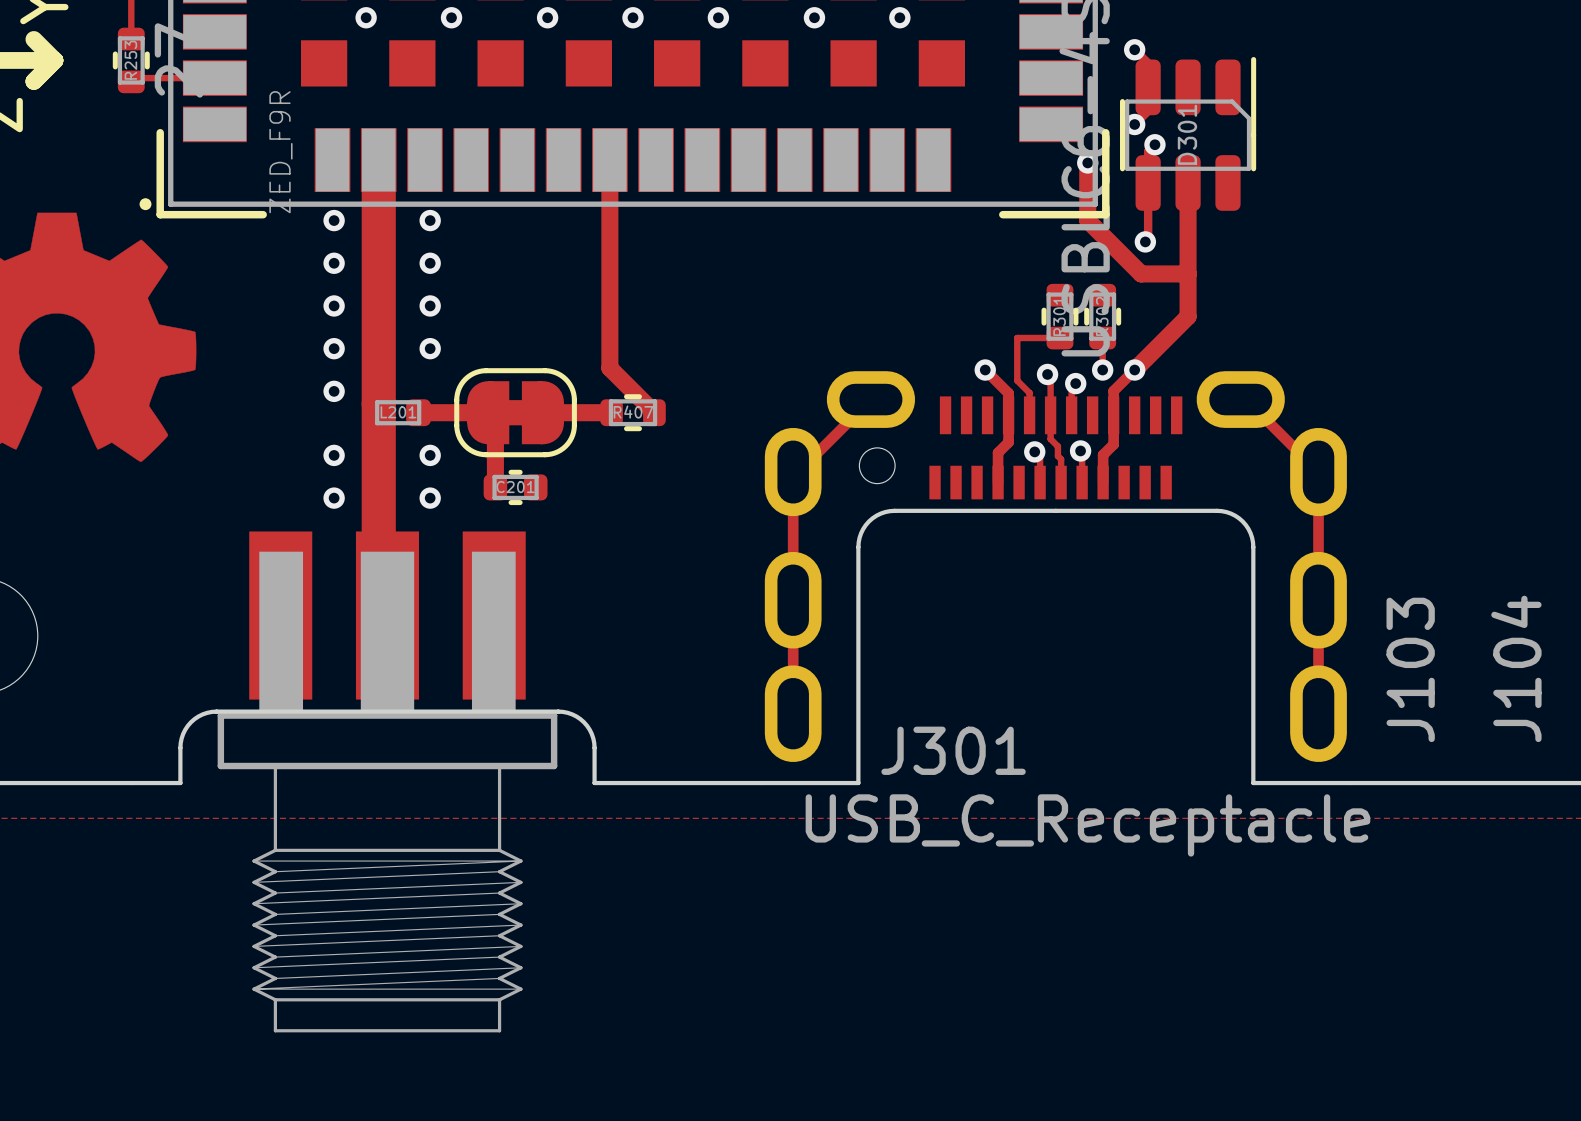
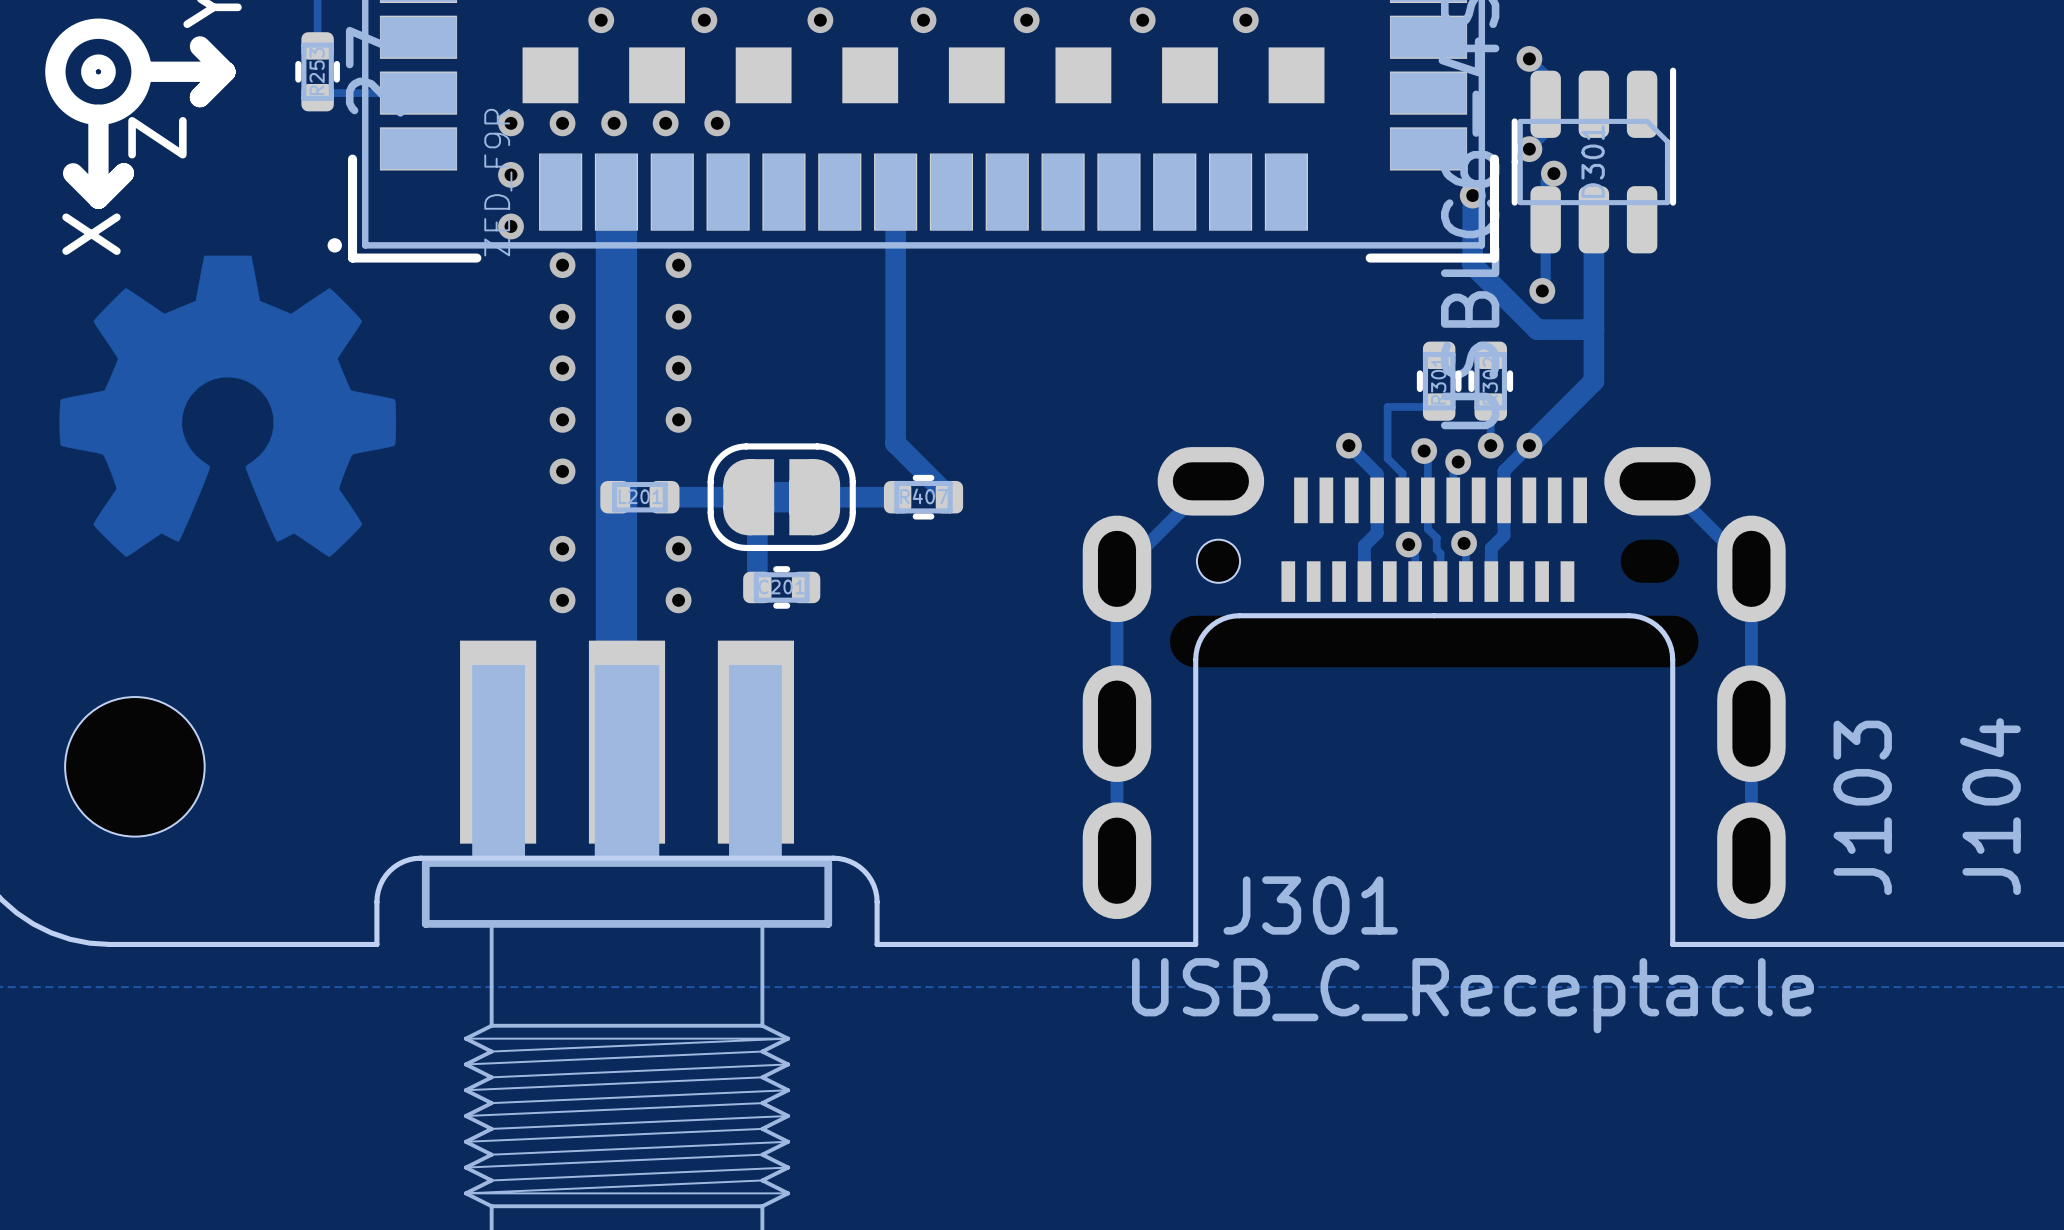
via: none -> (510, 123)
via: none -> (562, 123)
via: none -> (614, 123)
via: none -> (665, 123)
via: none -> (717, 123)
via: none -> (510, 174)
via: none -> (510, 226)

